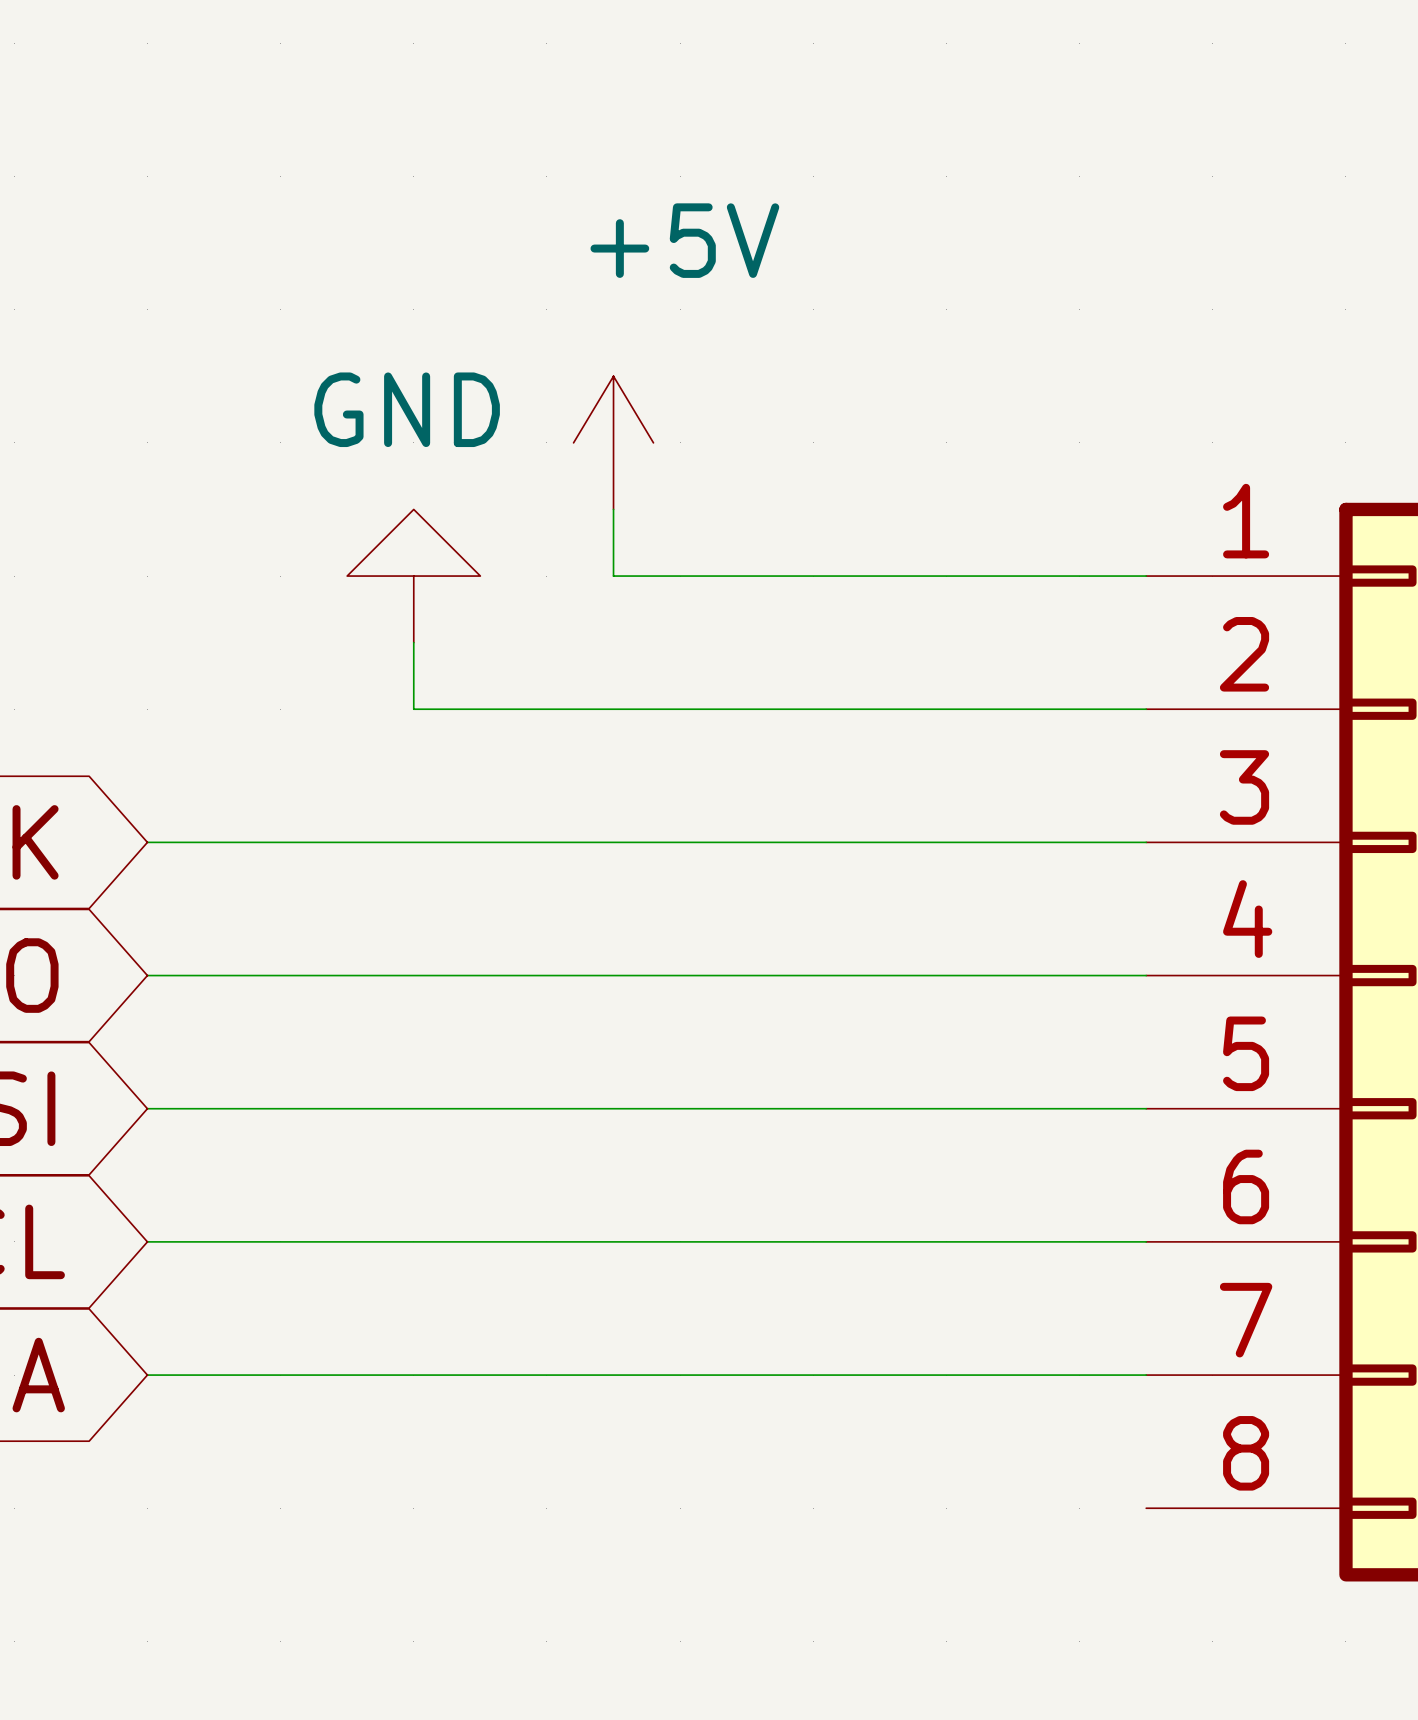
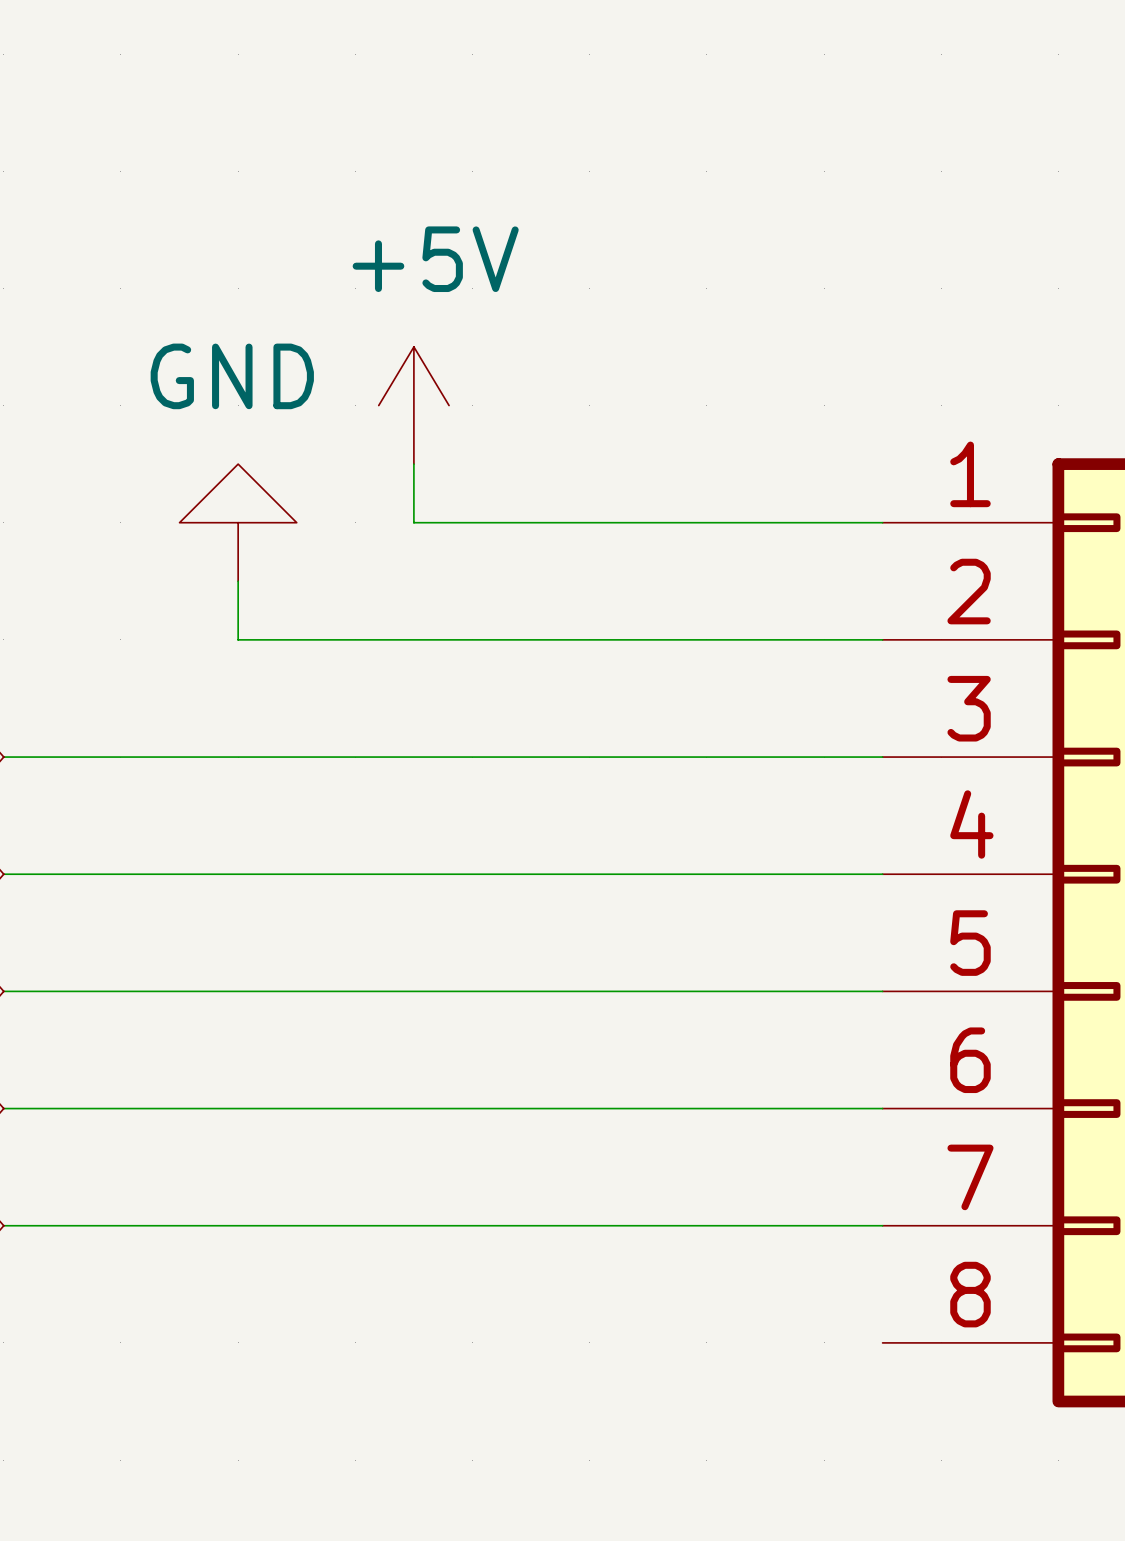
power symbol text position: +5V (684, 240) -> +5V (435, 259)

